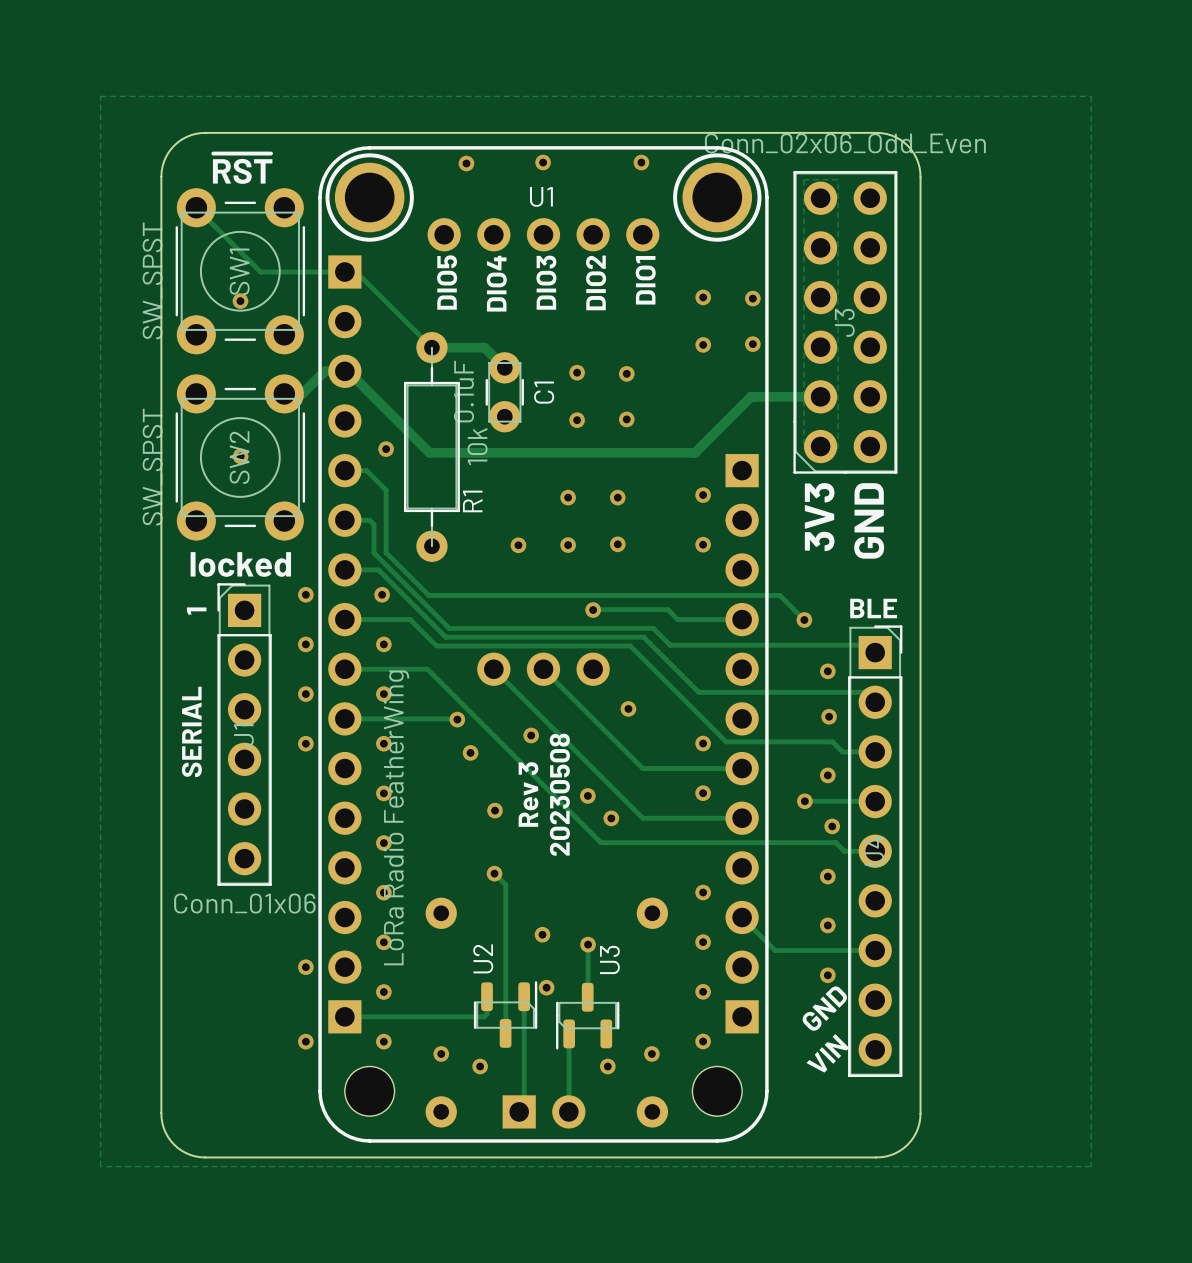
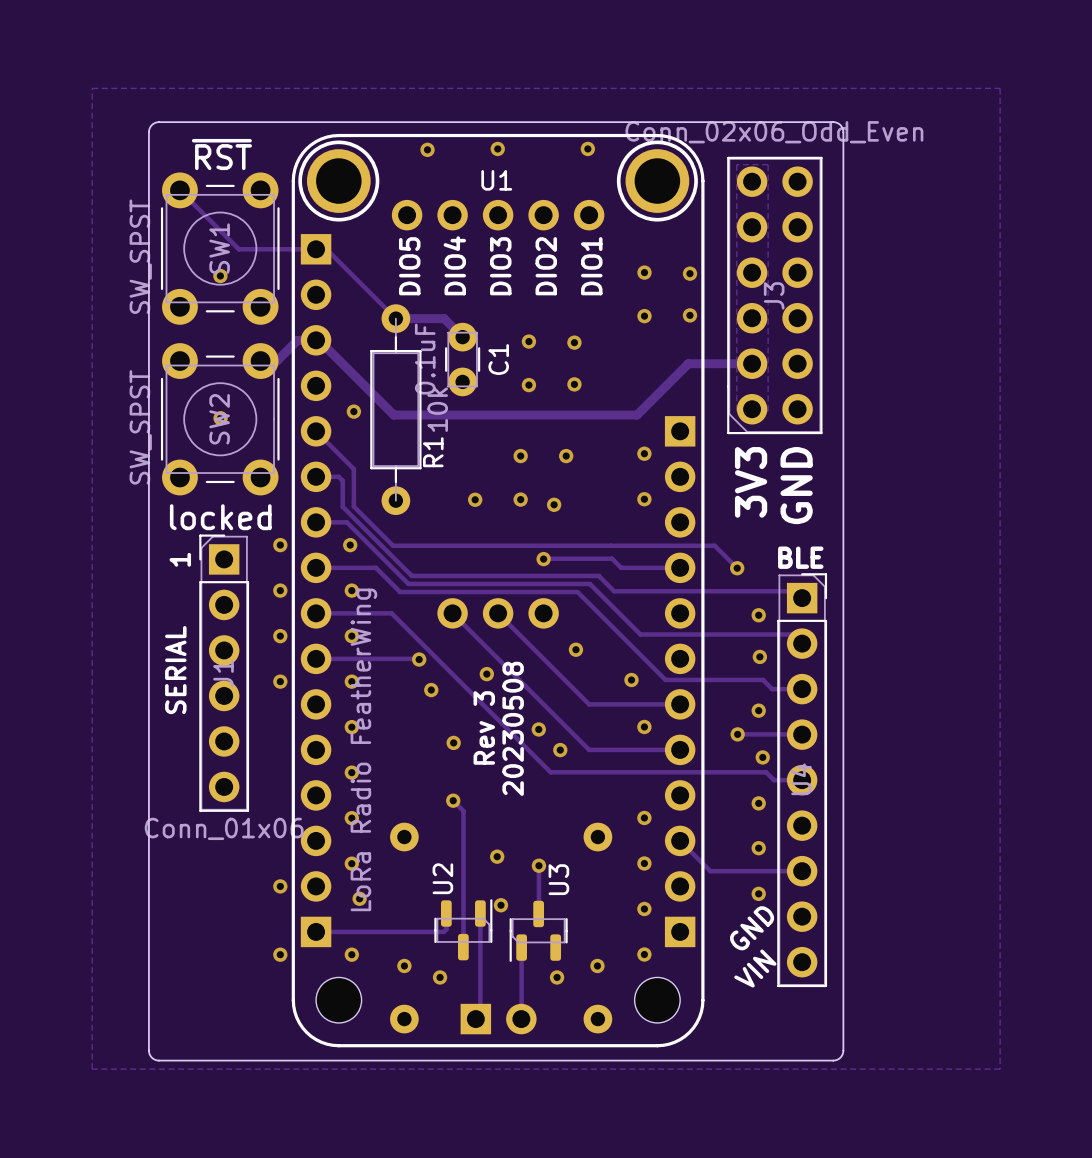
board edge: (205, 132) (876, 132) (895, 137) (907, 145) (914, 153) (918, 162) (920, 177) (920, 1113) (916, 1132) (907, 1144) (899, 1150) (890, 1155) (876, 1157) (205, 1157) (185, 1153) (177, 1147) (167, 1136) (163, 1127) (161, 1113) (161, 176) (165, 157) (174, 145) (191, 135) (205, 132) -> (159, 122) (151, 125) (148, 132) (148, 1050) (151, 1056) (158, 1060) (833, 1060) (839, 1058) (843, 1050) (843, 132) (841, 125) (833, 122) (159, 122)
track: (344, 470) (366, 470) (386, 490) (386, 511) -> (316, 431) (353, 469)
via position: (617, 544) -> (554, 504)
via position: (703, 743) -> (631, 680)
via position: (383, 992) -> (359, 898)

